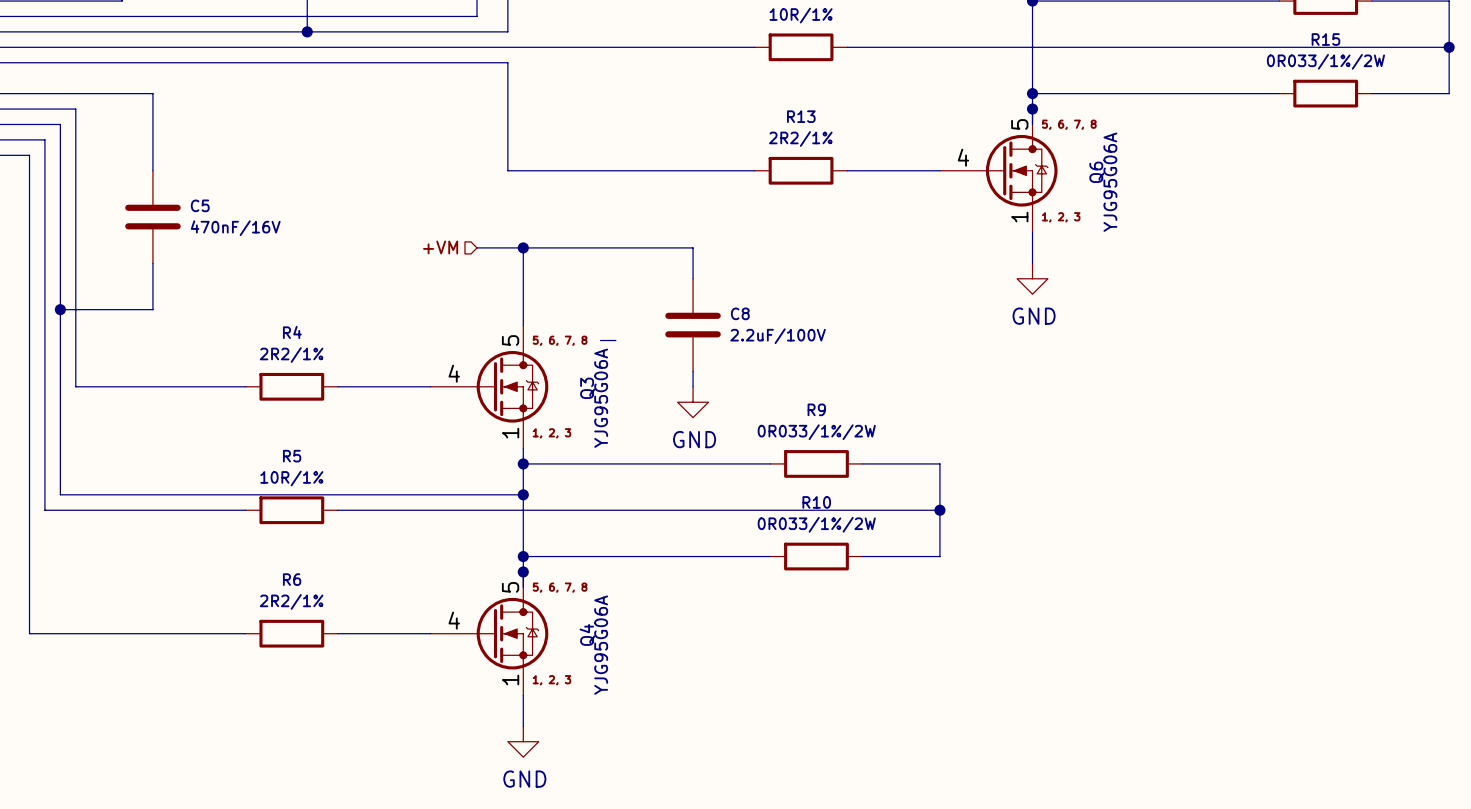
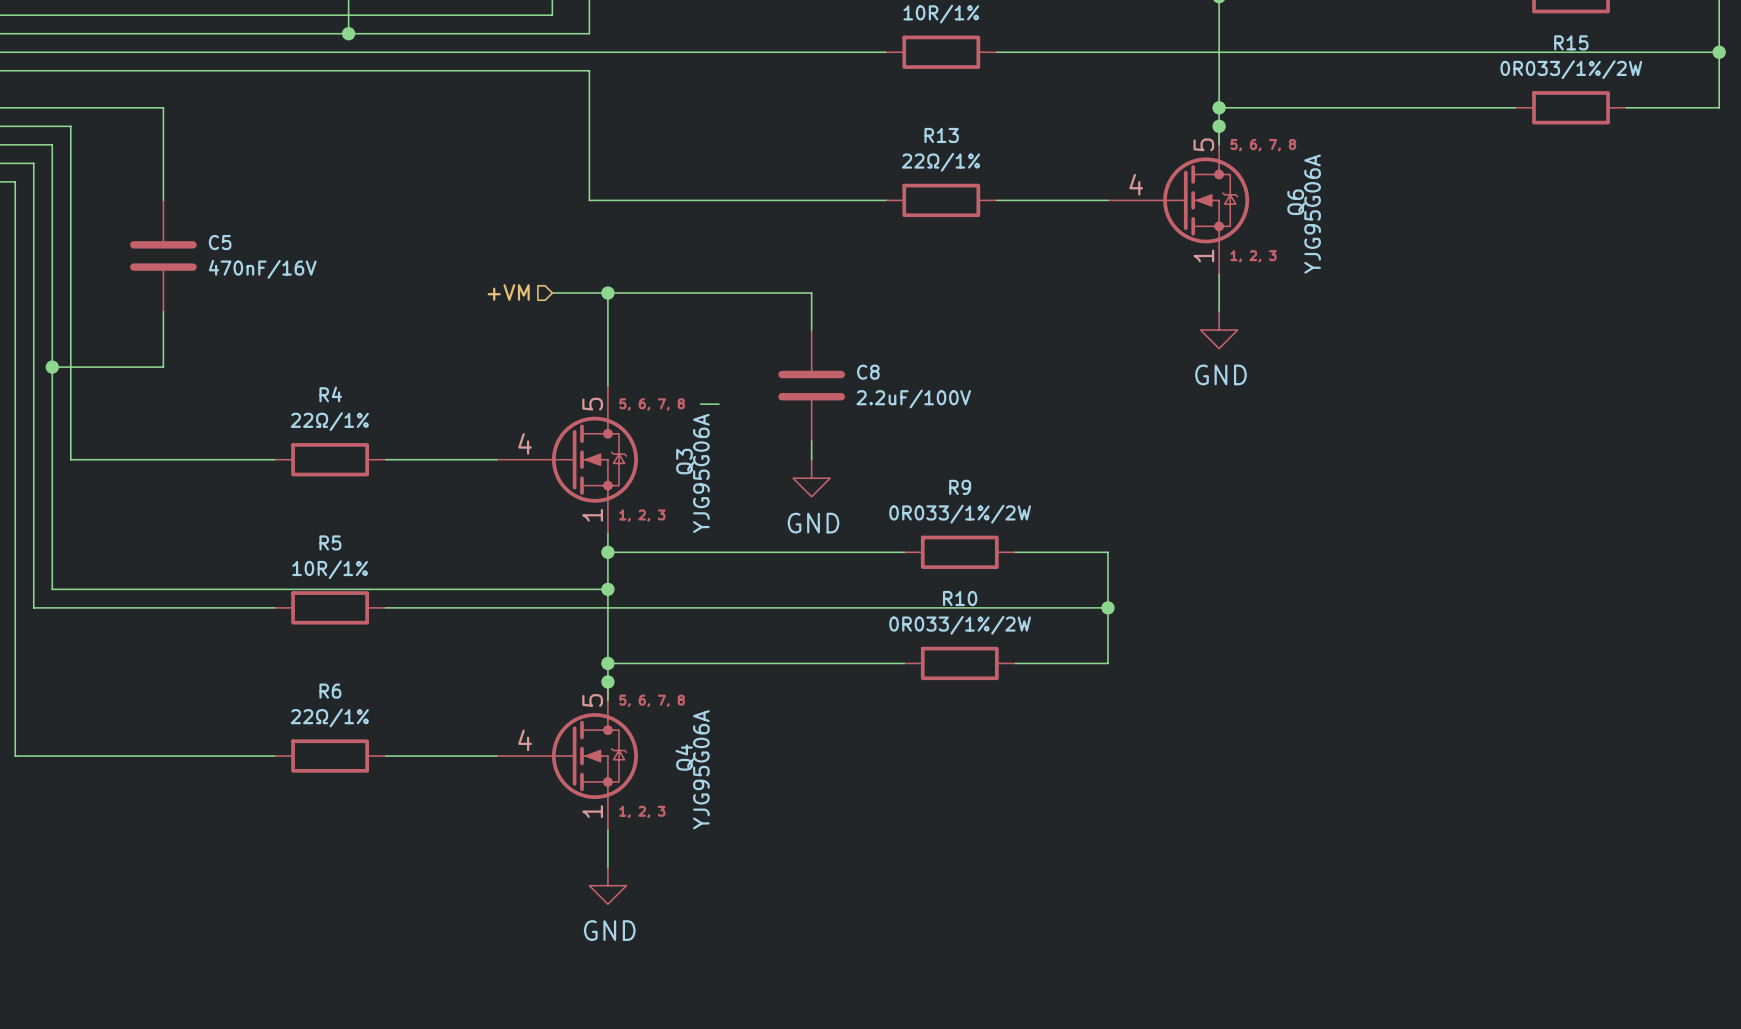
R13 value: 2R2/1% (800, 138) -> 22Ω/1% (940, 162)
R4 value: 2R2/1% (291, 355) -> 22Ω/1% (329, 421)
R6 value: 2R2/1% (291, 601) -> 22Ω/1% (329, 717)

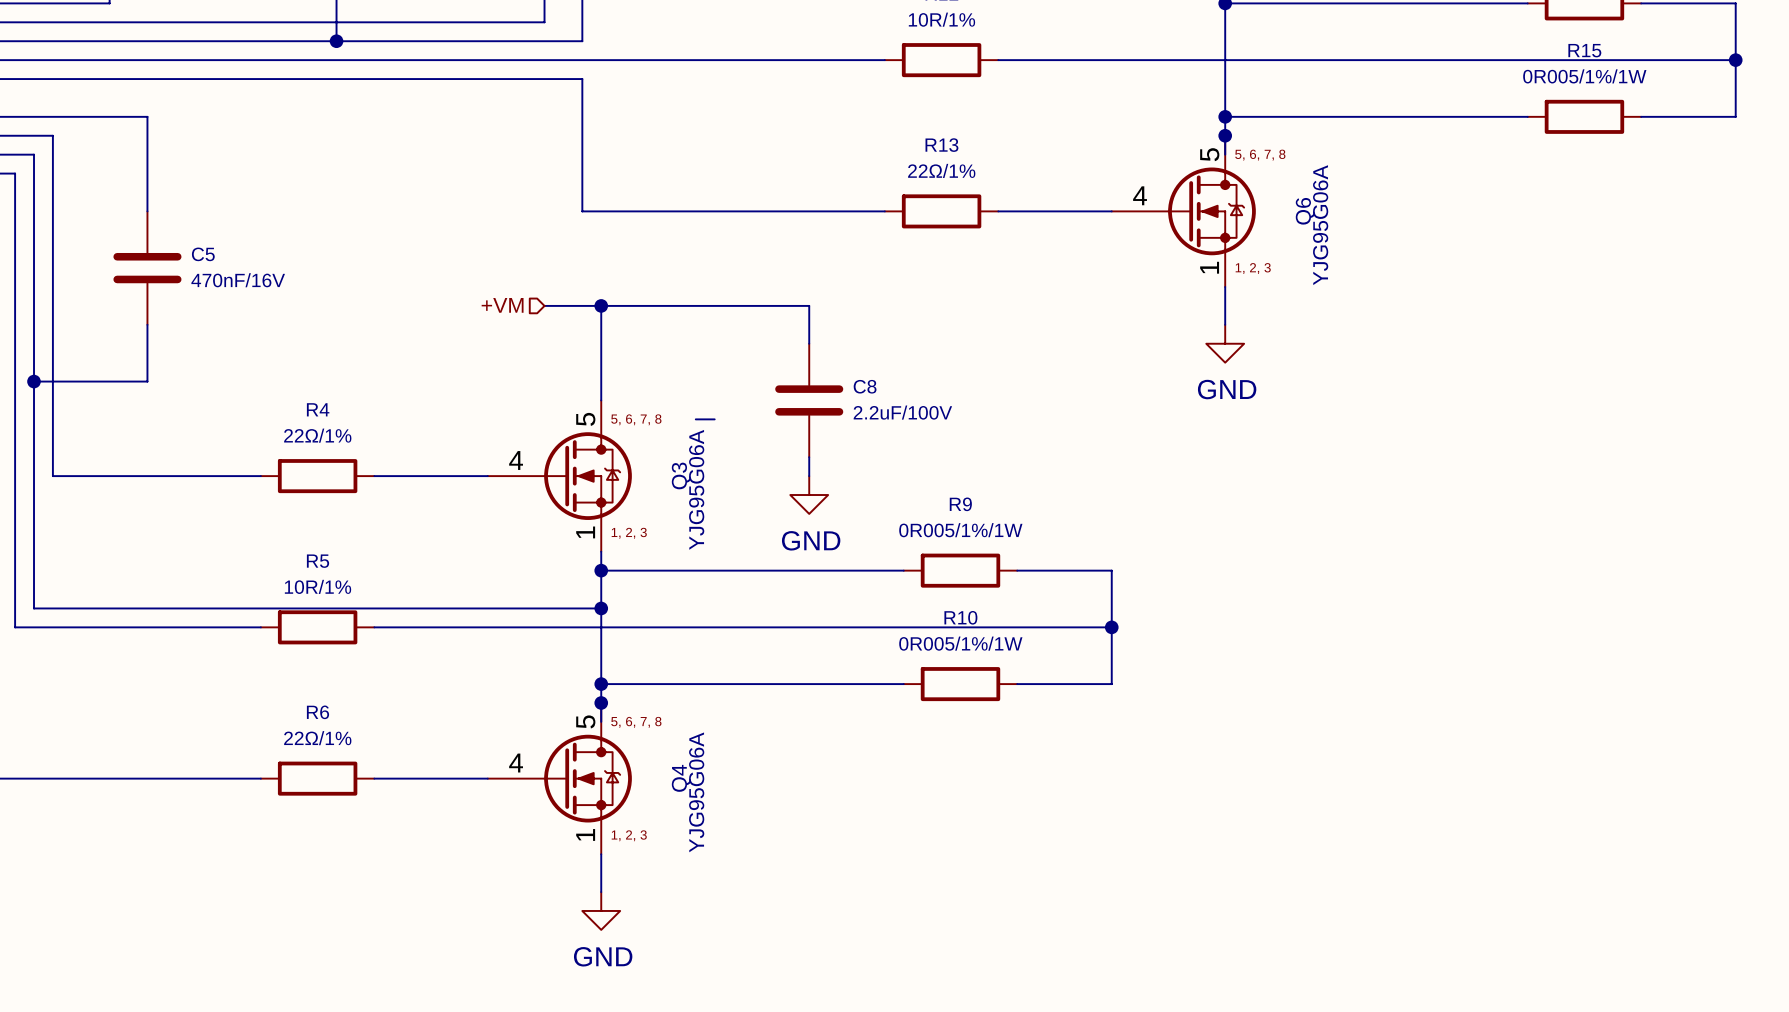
R15 value: 0R033/1%/2W (1571, 69) -> 0R005/1%/1W (1584, 76)
R9 value: 0R033/1%/2W (960, 514) -> 0R005/1%/1W (960, 530)
R10 value: 0R033/1%/2W (960, 625) -> 0R005/1%/1W (960, 643)

